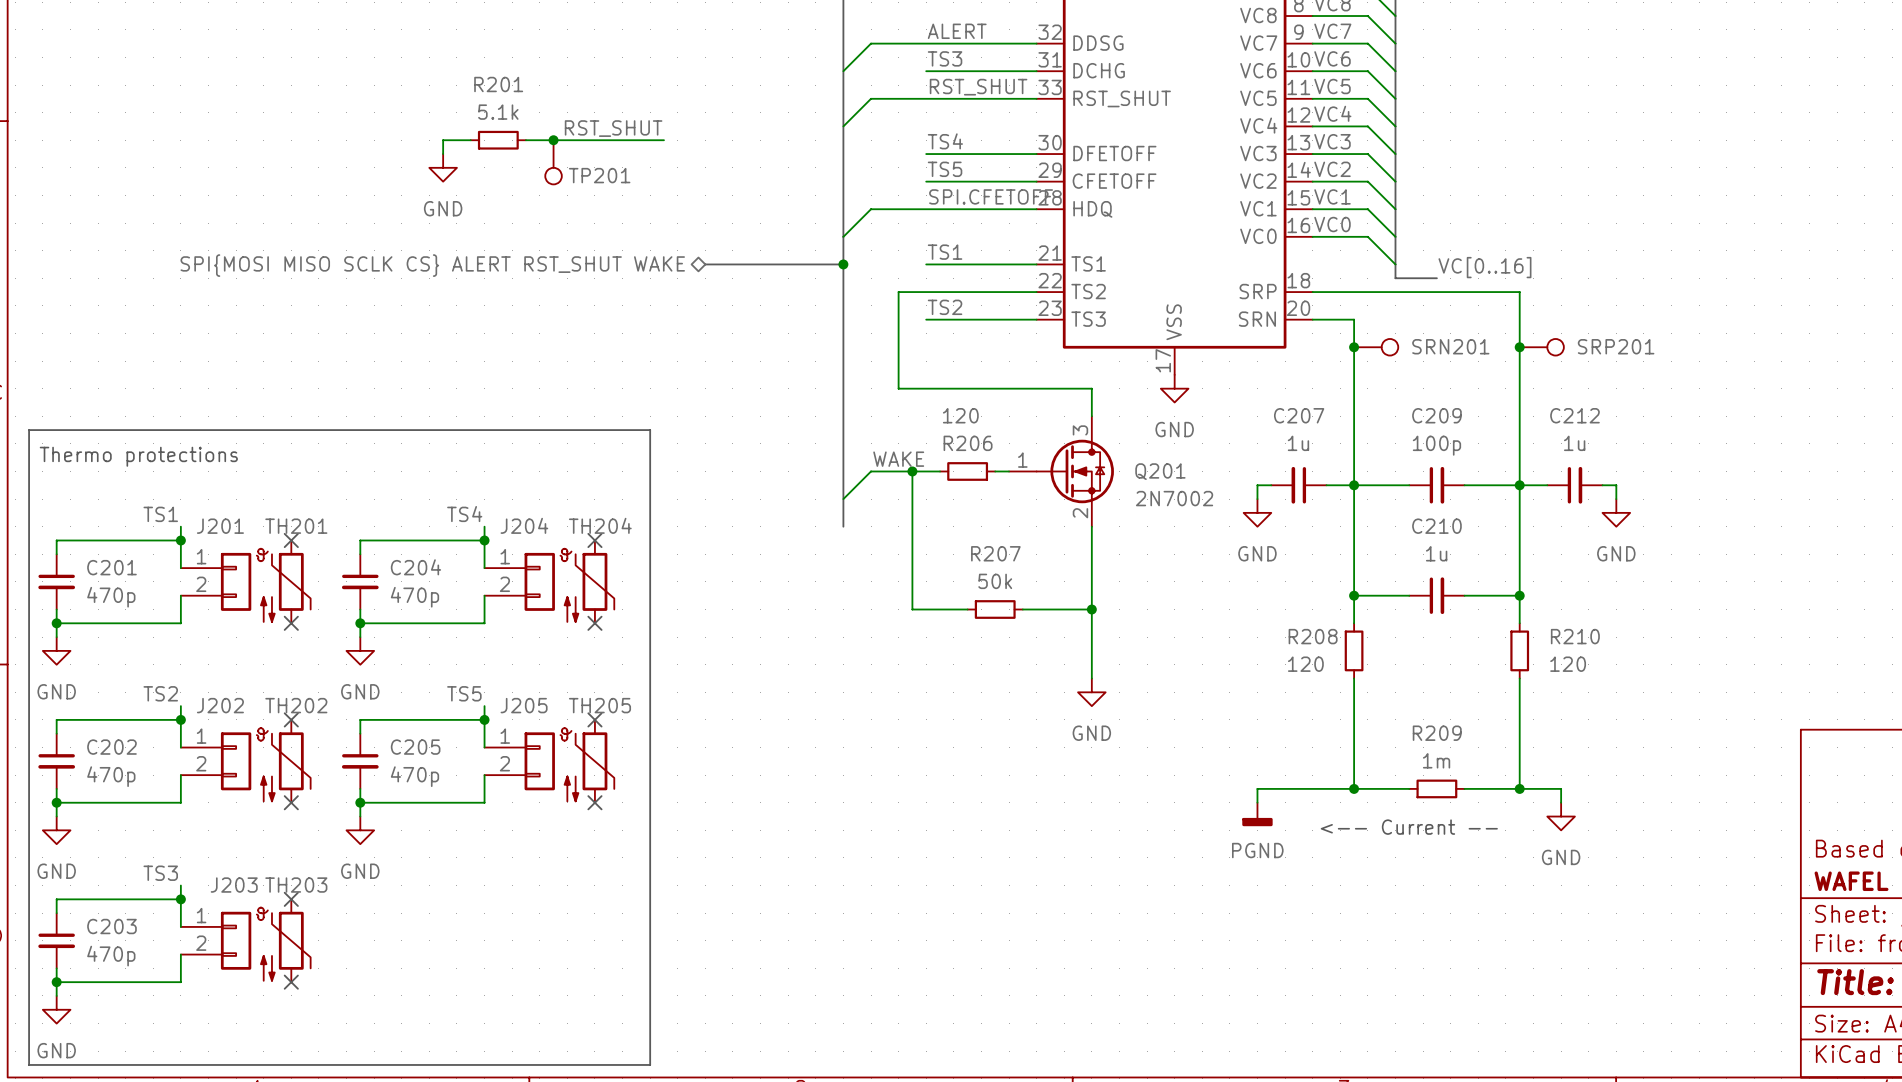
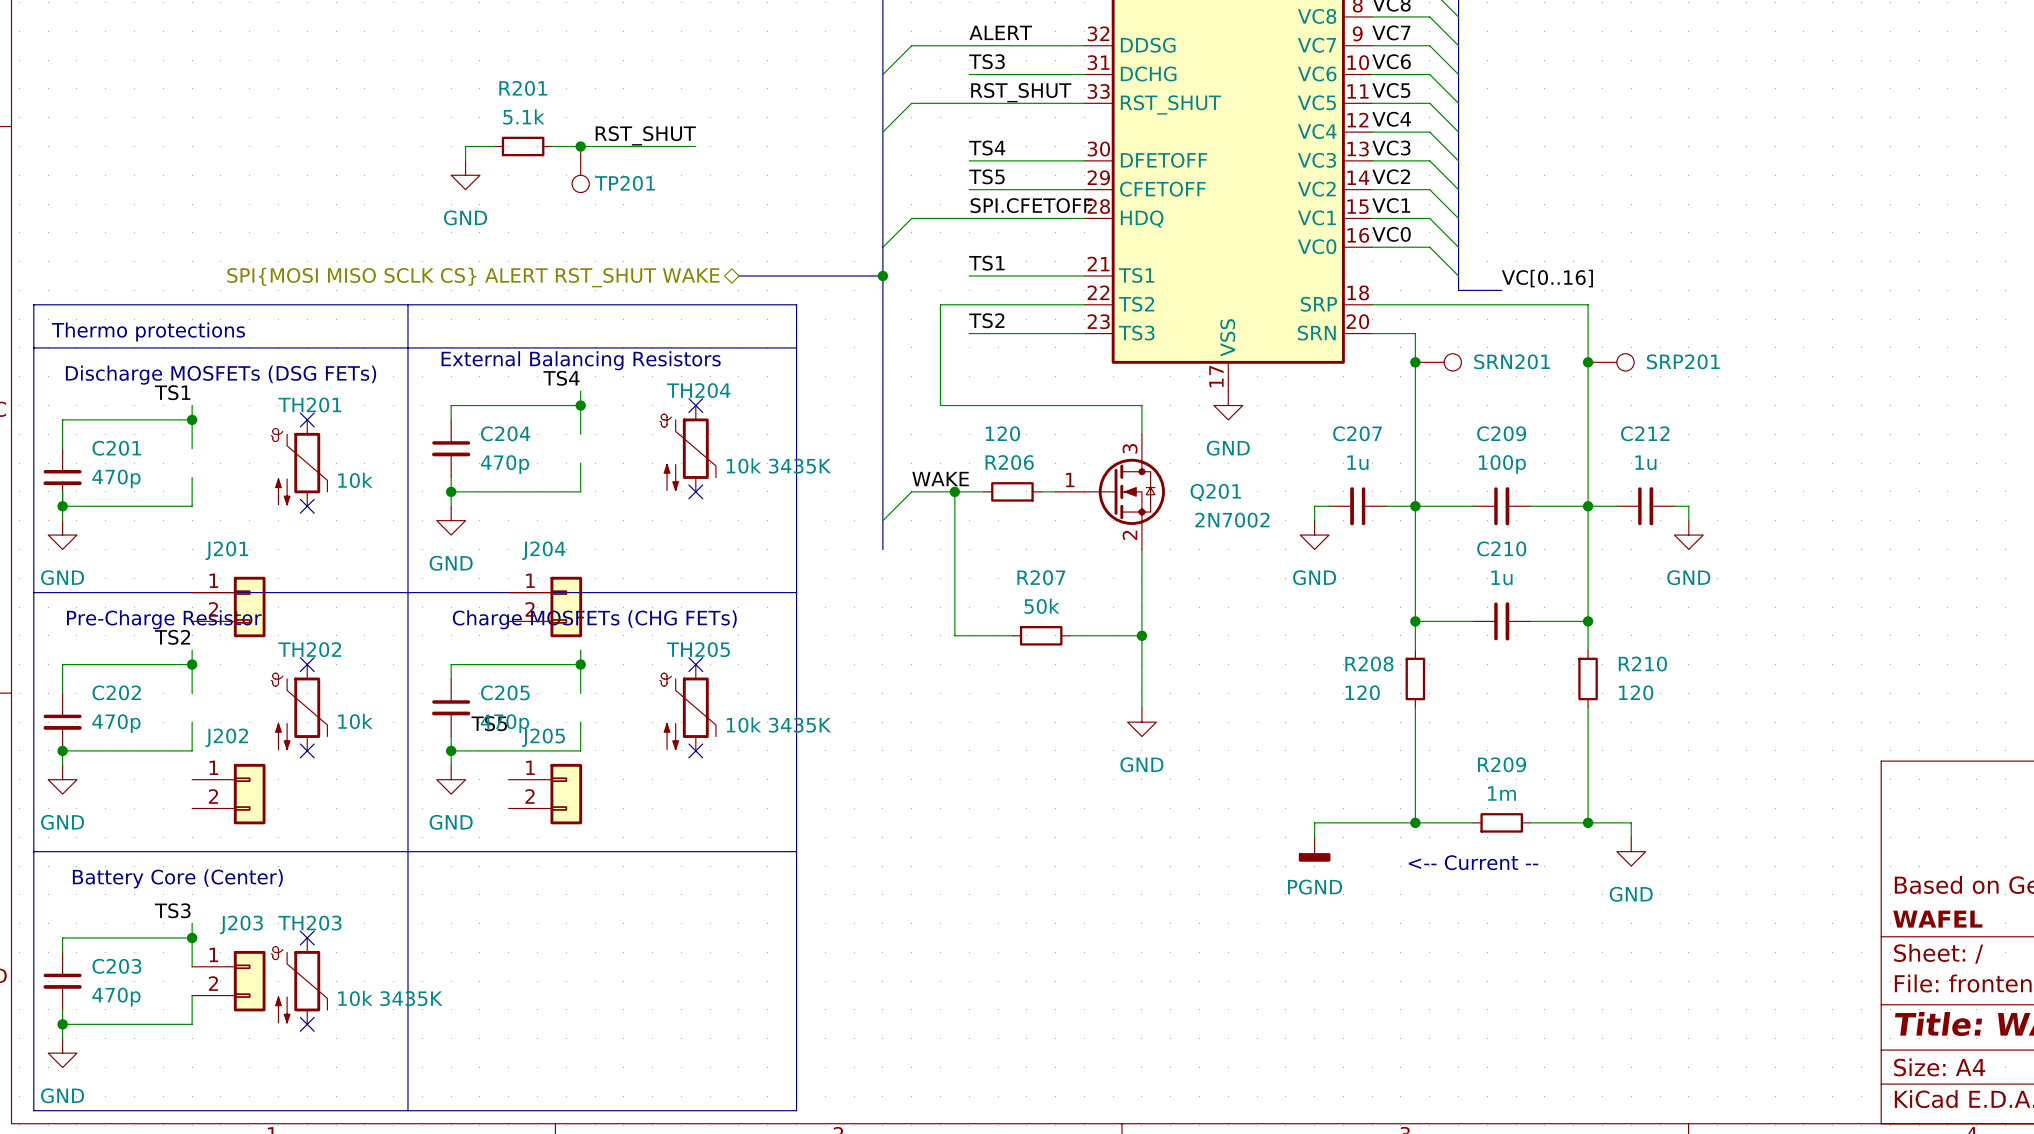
line: none -> (407, 304) (407, 1110)
line: none -> (33, 347) (796, 347)
text: none -> External Balancing Resistors (581, 360)
text: none -> Discharge MOSFETs (DSG FETs) (221, 375)
junction: none -> (580, 405)
no-connect mark: none -> (695, 405)
wire: none -> (192, 419) (62, 419) (62, 448)
junction: none -> (192, 419)
no-connect mark: none -> (307, 419)
line: (29, 430) (650, 430) (650, 1064) -> (33, 448) (33, 304) (796, 304) (796, 1110) (681, 1110)
TH204 value: none -> 10k 3435K (778, 465)
text position: Thermo protections (138, 456) -> Thermo protections (148, 331)
TH201 value: none -> 10k (355, 480)
junction: none -> (451, 491)
no-connect mark: none -> (695, 491)
junction: none -> (62, 506)
no-connect mark: none -> (307, 506)
power symbol: none -> GND (451, 520)
power symbol: none -> GND (62, 535)
label position: TS1 (160, 514) -> TS1 (172, 392)
label position: TS4 (464, 514) -> TS4 (561, 378)
wire: (180, 526) (180, 568) -> (192, 405) (192, 448)
wire: (484, 526) (484, 568) -> (580, 391) (580, 434)
wire: (180, 540) (56, 540) (56, 554) -> none
junction: (180, 540) -> none
no-connect mark: (291, 540) -> none
wire: (484, 540) (360, 540) (360, 554) -> (580, 405) (451, 405) (451, 419)
junction: (484, 540) -> none
no-connect mark: (594, 540) -> none
C201 name position: C201 (111, 567) -> C201 (116, 448)
line: none -> (33, 592) (796, 592)
C201 position: (56, 581) -> (62, 477)
TH201 position: (283, 581) -> (299, 463)
C204 position: (360, 581) -> (451, 448)
TH204 position: (587, 581) -> (687, 448)
text: none -> Pre-Charge Resistor (164, 619)
text: none -> Charge MOSFETs (CHG FETs) (594, 619)
wire: (180, 595) (180, 623) (56, 623) -> (192, 477) (192, 506) (62, 506)
wire: (484, 595) (484, 623) (360, 623) -> (580, 463) (580, 491) (451, 491)
C201 value position: 470p (111, 597) -> 470p (116, 478)
wire: (56, 609) (56, 637) -> (62, 491) (62, 520)
wire: (360, 609) (360, 637) -> (451, 477) (451, 506)
junction: (56, 623) -> none
wire: none -> (192, 650) (192, 693)
no-connect mark position: (291, 623) -> (307, 664)
junction: (360, 623) -> none
no-connect mark: (594, 623) -> none
wire: none -> (192, 664) (62, 664) (62, 693)
junction: none -> (192, 664)
wire: none -> (580, 664) (451, 664) (451, 678)
junction: none -> (580, 664)
no-connect mark: none -> (695, 664)
power symbol: GND (56, 650) -> none
power symbol: GND (360, 650) -> none
TH202 value: none -> 10k (355, 721)
wire: none -> (192, 722) (192, 736)
wire: none -> (580, 722) (580, 750) (508, 750)
label position: TS2 (160, 693) -> TS2 (172, 637)
TH205 value: none -> 10k 3435K (778, 725)
wire: (484, 706) (484, 747) -> (580, 650) (580, 693)
junction: none -> (62, 750)
wire: (180, 719) (180, 747) -> none
junction: (180, 719) -> none
wire: (429, 719) (360, 719) (360, 733) -> none
junction: none -> (451, 750)
junction: (484, 719) -> none
no-connect mark: (594, 719) -> none
no-connect mark: none -> (695, 750)
power symbol: none -> GND (62, 779)
C202 name position: C202 (111, 747) -> C202 (116, 692)
power symbol: none -> GND (451, 779)
C202 position: (56, 761) -> (62, 722)
TH202 position: (283, 761) -> (299, 707)
C205 position: (360, 761) -> (451, 707)
TH205 position: (587, 761) -> (687, 707)
wire: (180, 775) (180, 802) (56, 802) -> none
wire: (484, 775) (484, 802) (360, 802) -> none
C202 value position: 470p (111, 776) -> 470p (116, 723)
wire: (56, 788) (56, 816) -> none
wire: (360, 788) (360, 816) -> (451, 736) (451, 765)
junction: (56, 802) -> none
no-connect mark: (291, 802) -> none
junction: (360, 802) -> none
no-connect mark: (594, 802) -> none
line: none -> (33, 851) (796, 851)
power symbol: GND (56, 830) -> none
power symbol: GND (360, 830) -> none
text: none -> Battery Core (Center) (177, 878)
TH203 value: none -> 10k 3435K (390, 998)

